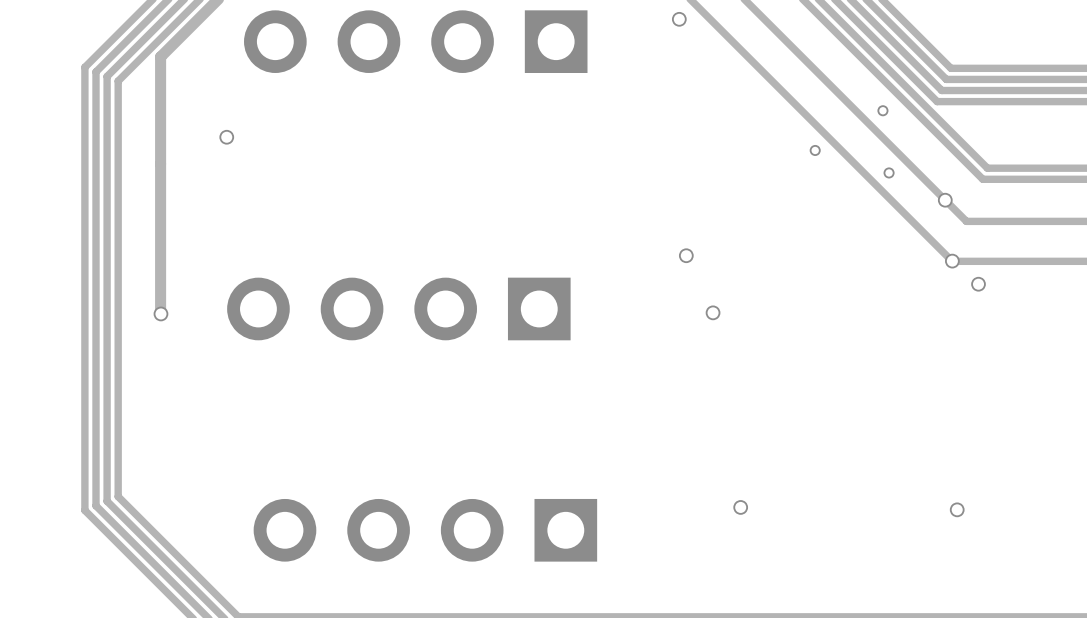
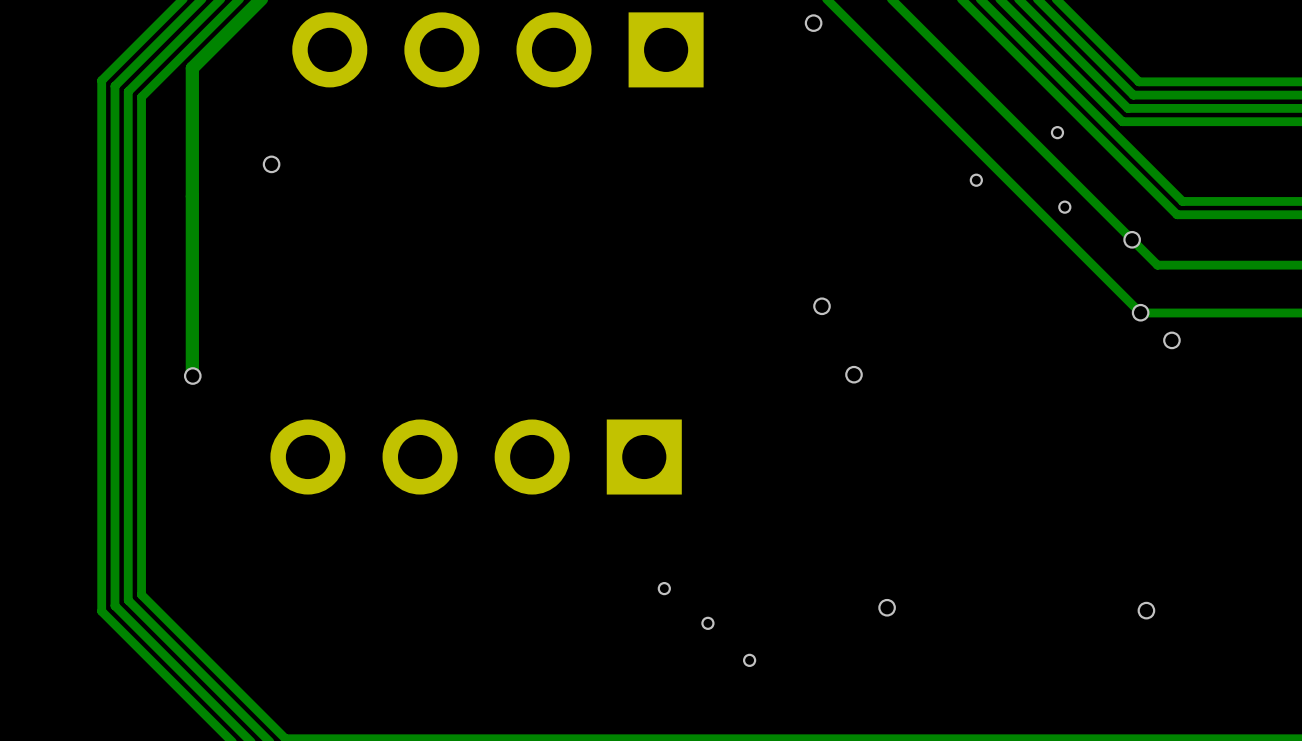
part position: (398, 308) -> (476, 457)
via: none -> (664, 588)
via: none -> (707, 623)
part: (425, 530) -> none
via: none -> (749, 660)

